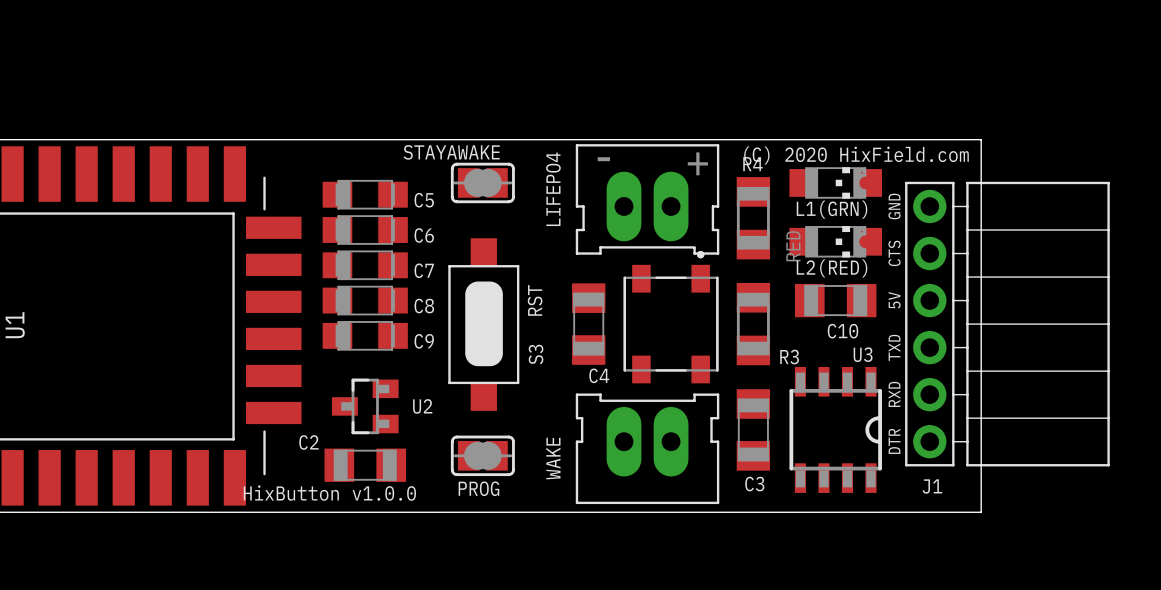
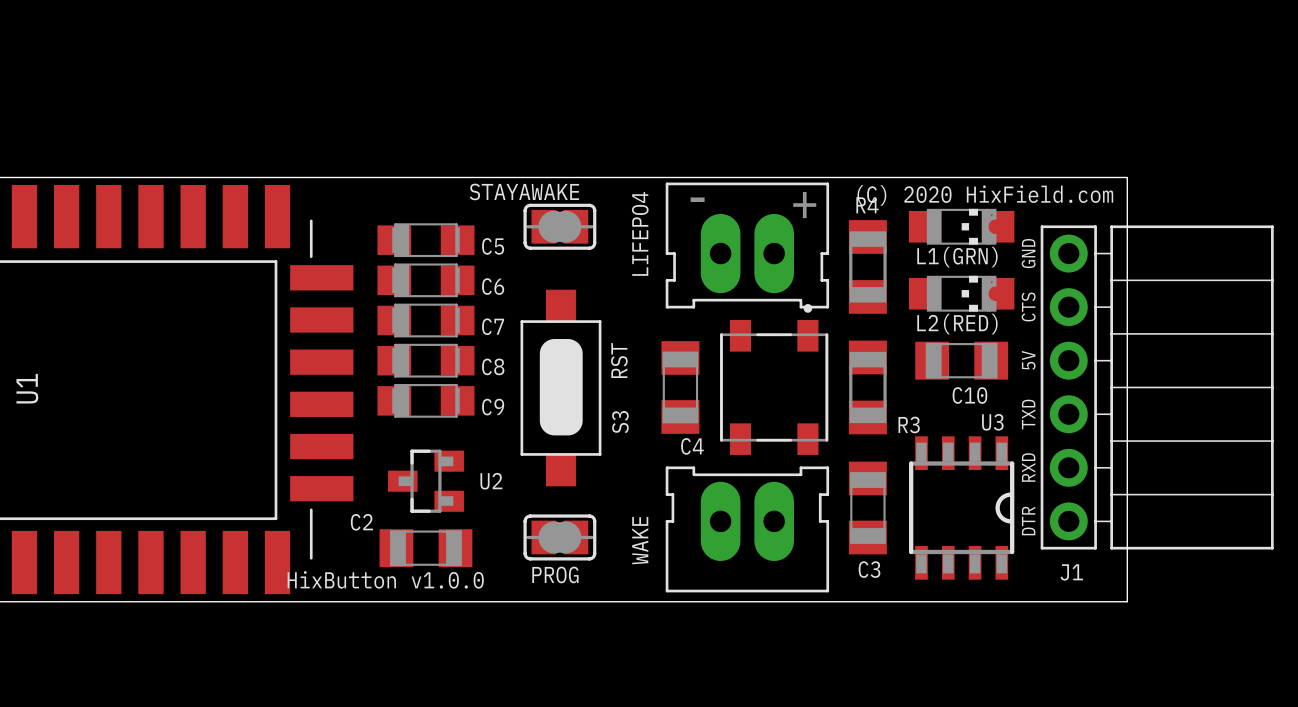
L2(RED) value: RED (793, 246) -> none

